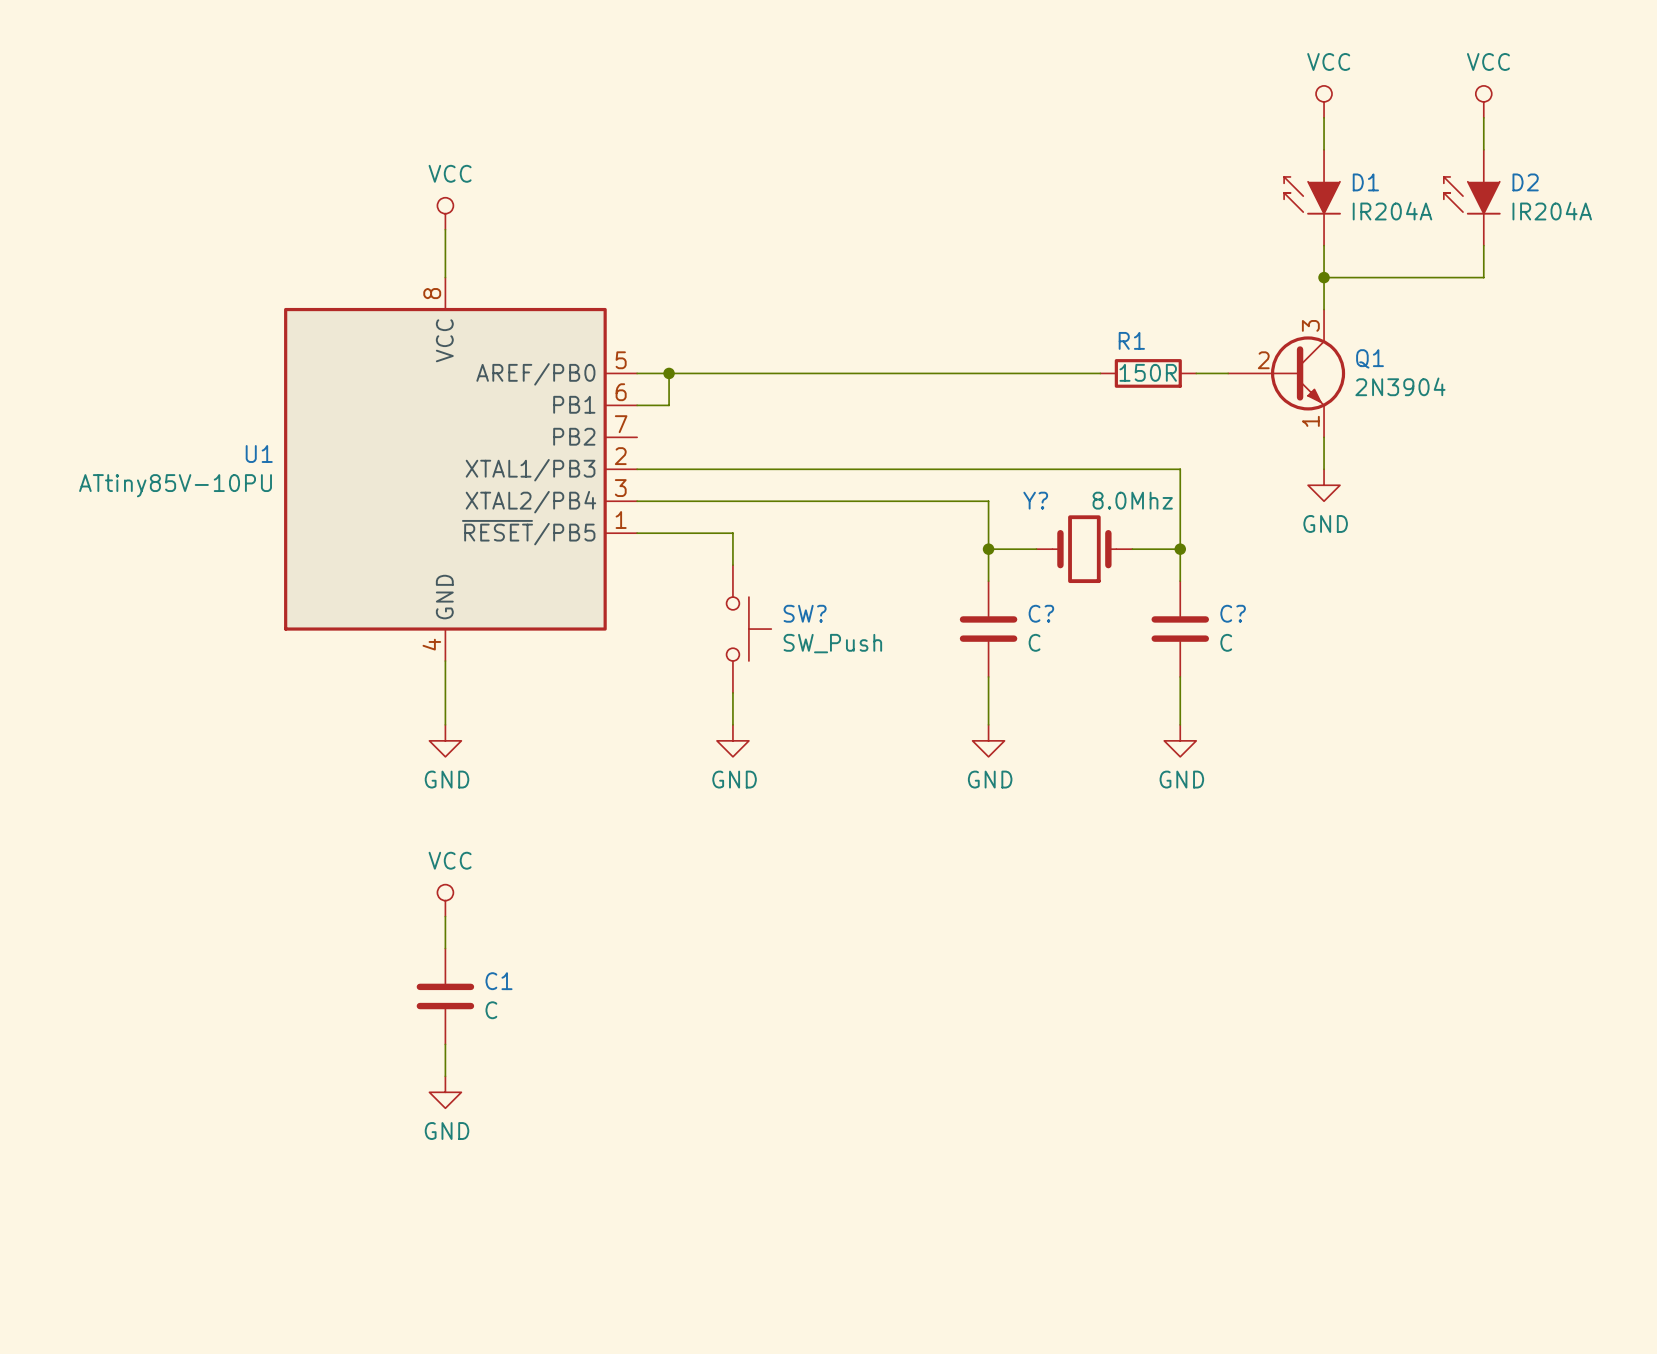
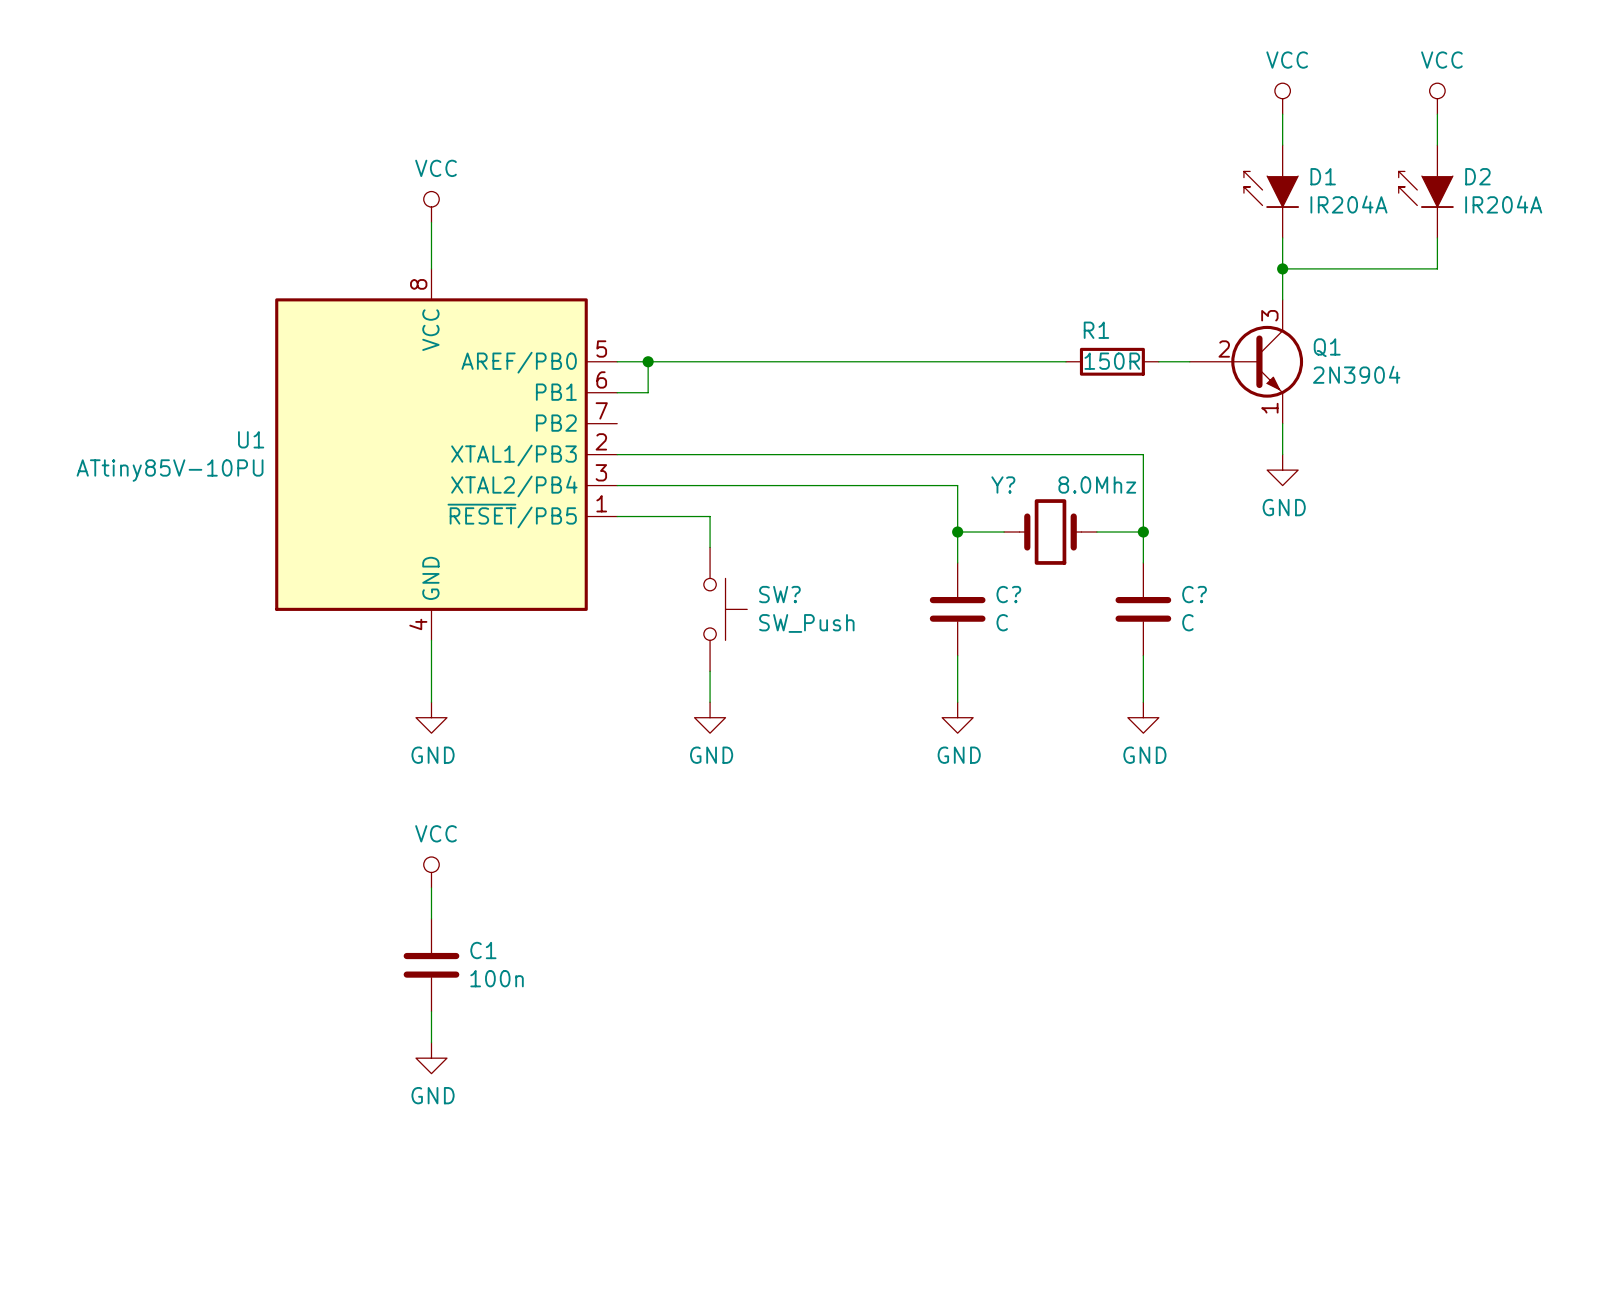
C1 value: C (491, 1010) -> 100n (497, 978)

